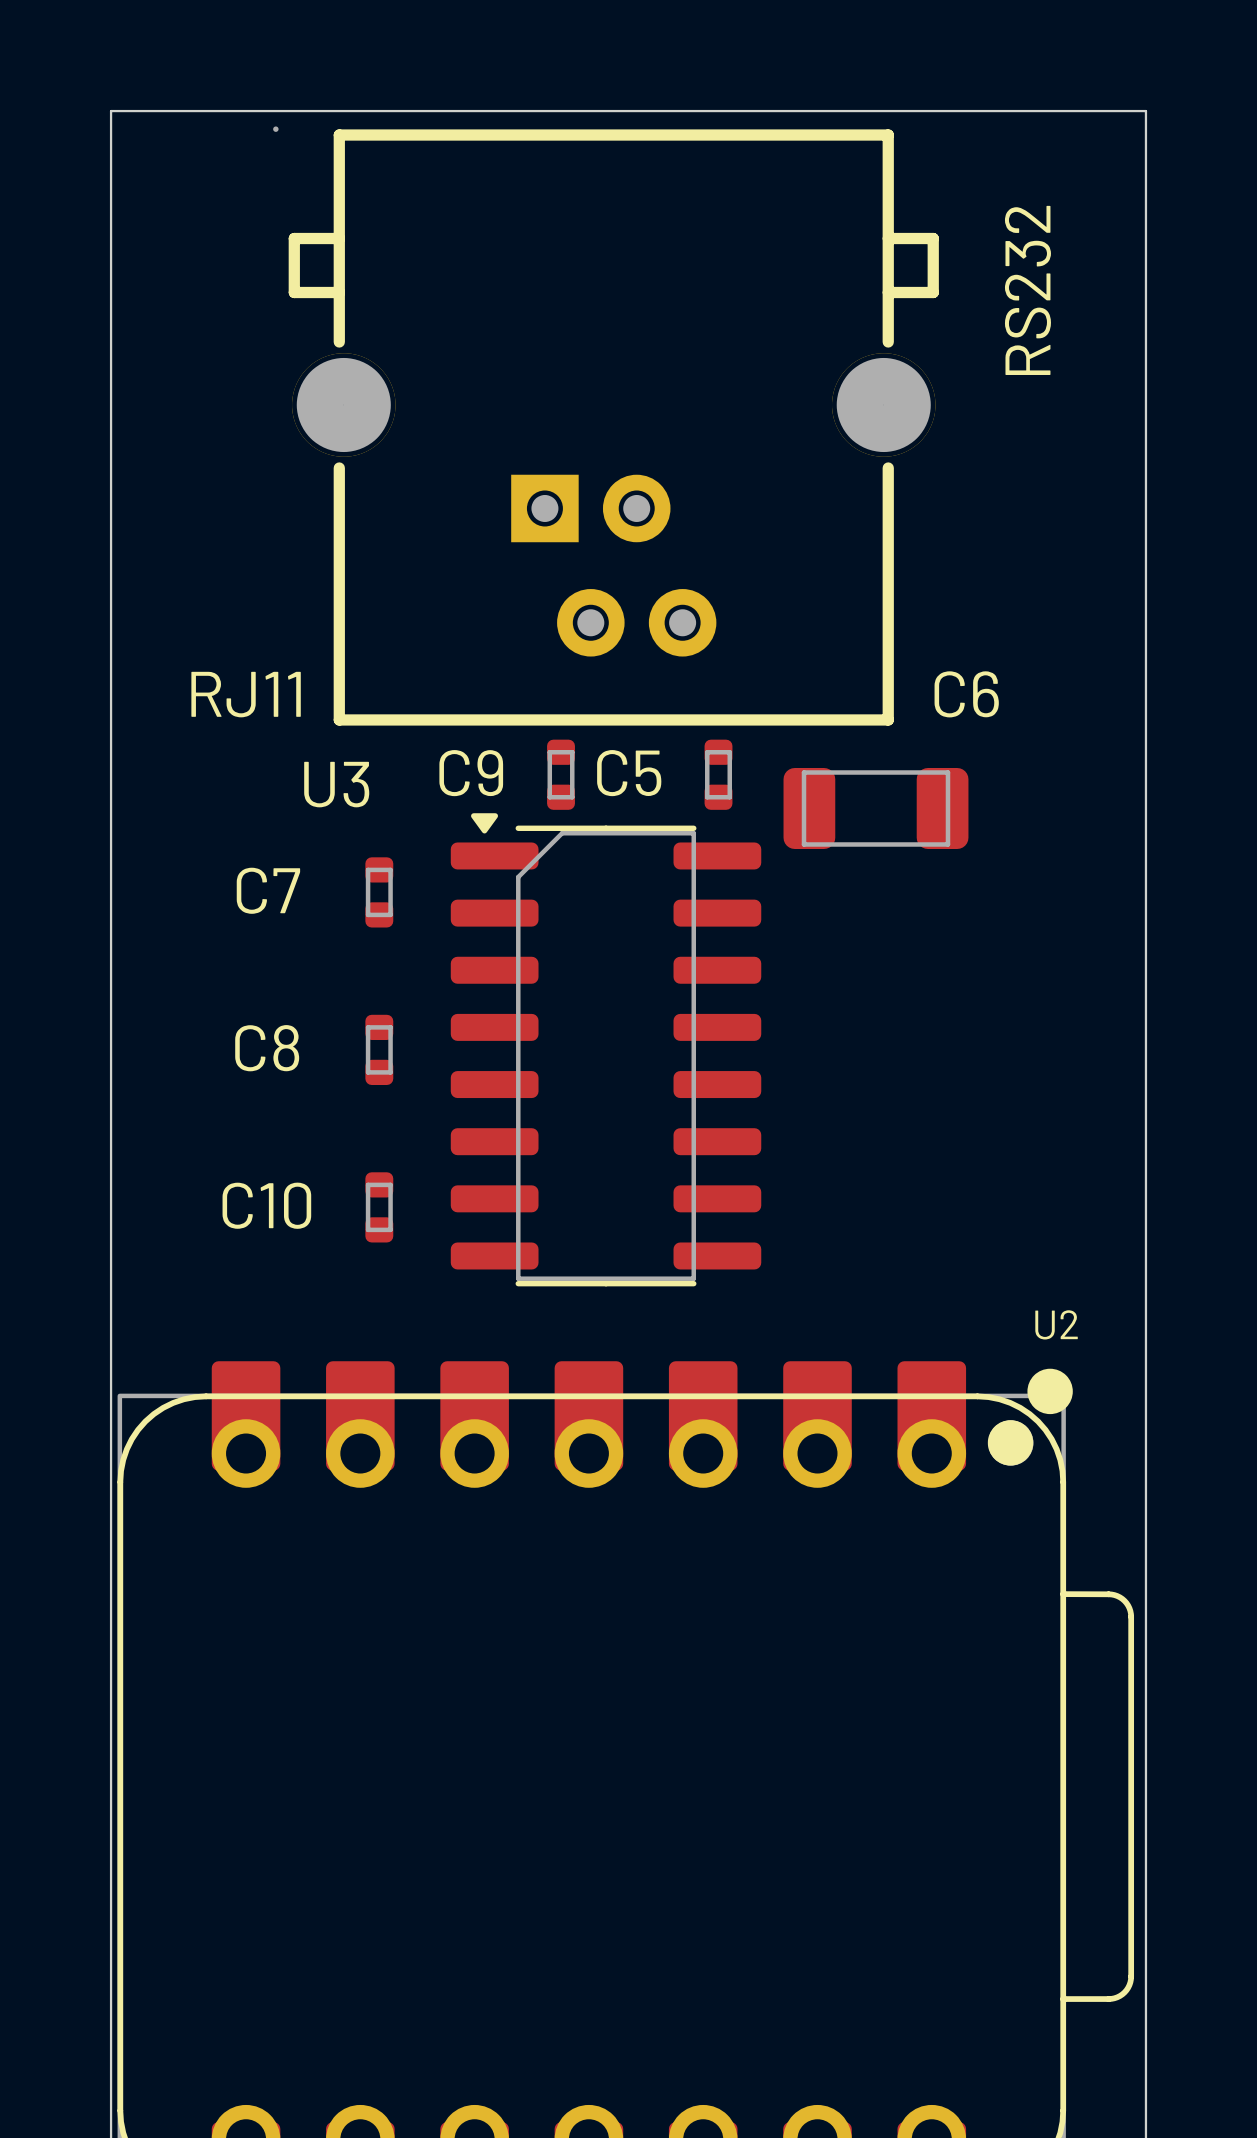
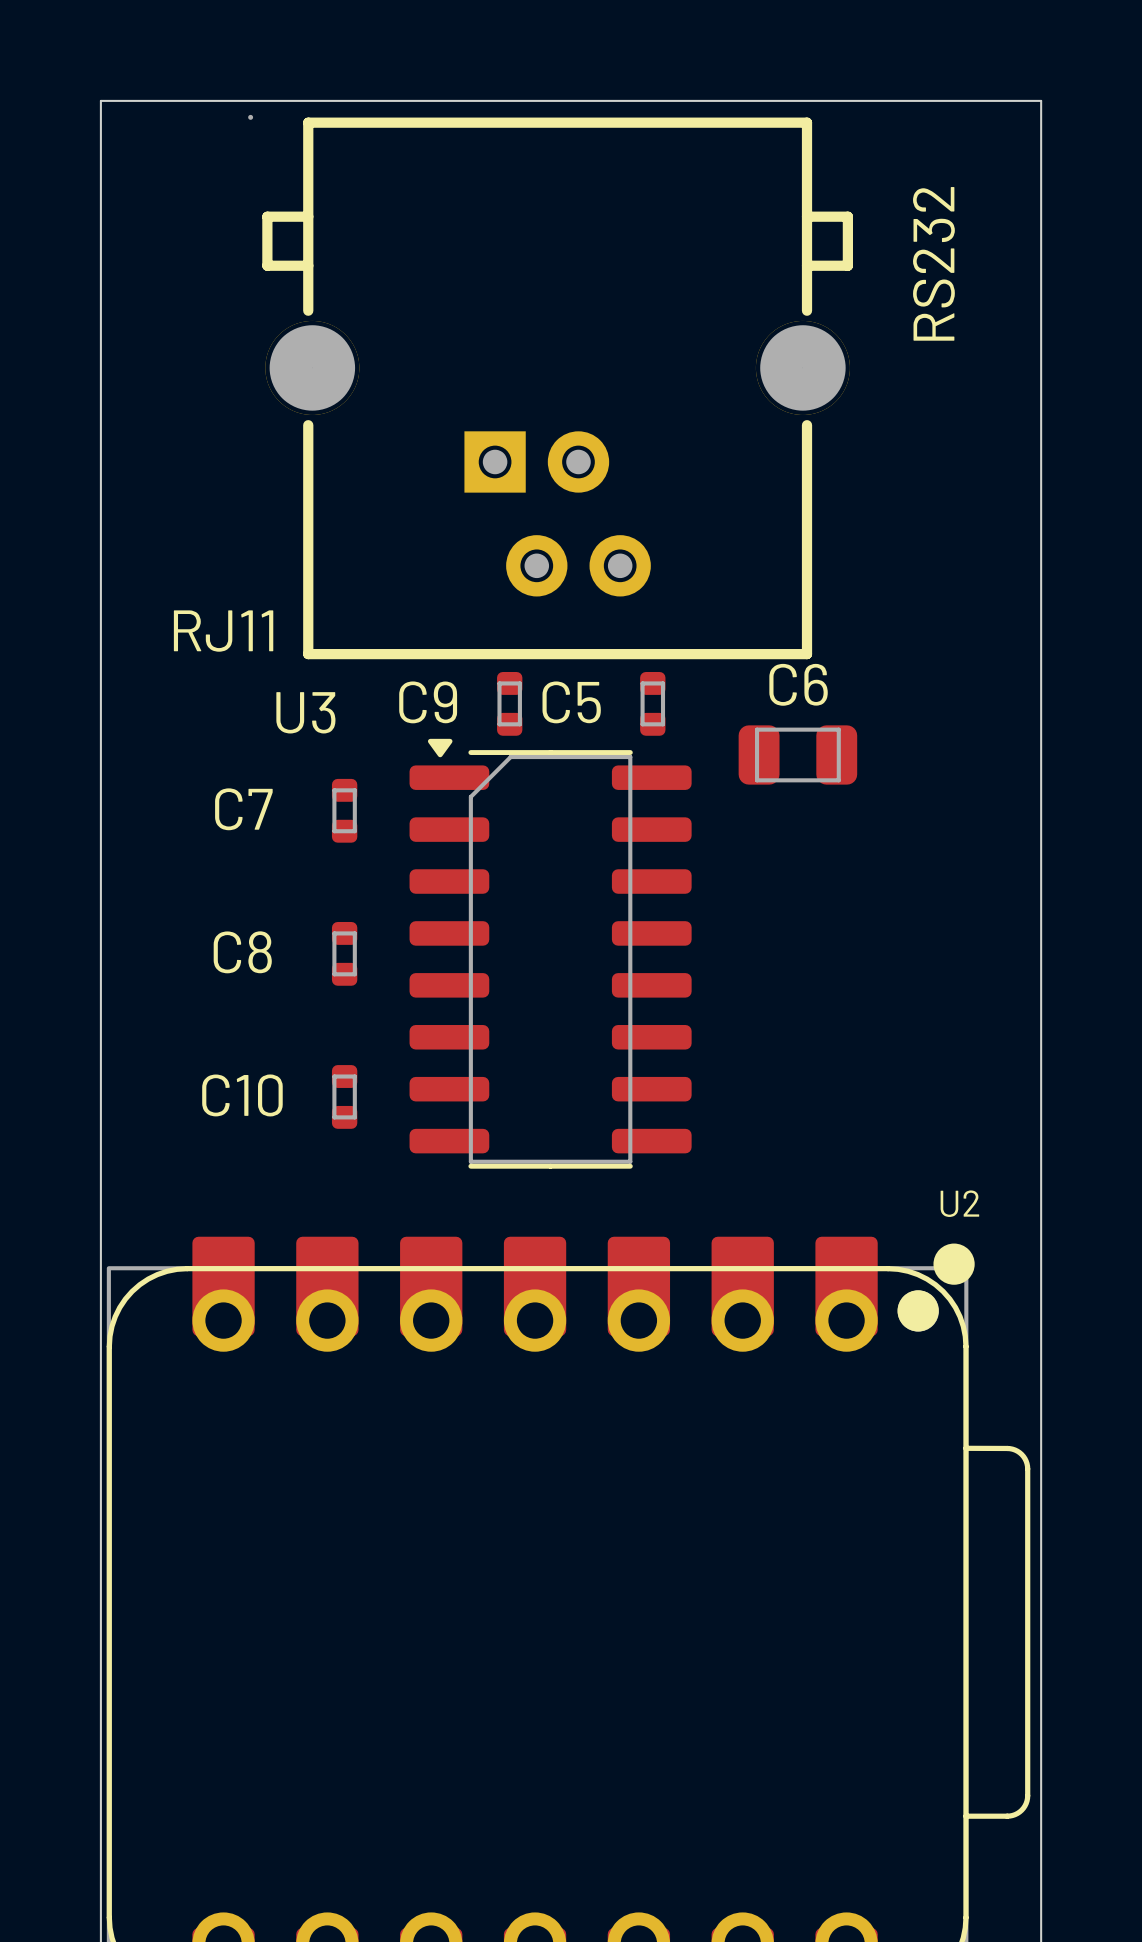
C6 name position: C6 (966, 694) -> C6 (798, 684)
C6 footprint: [783, 768, 969, 849] -> [738, 725, 858, 785]

